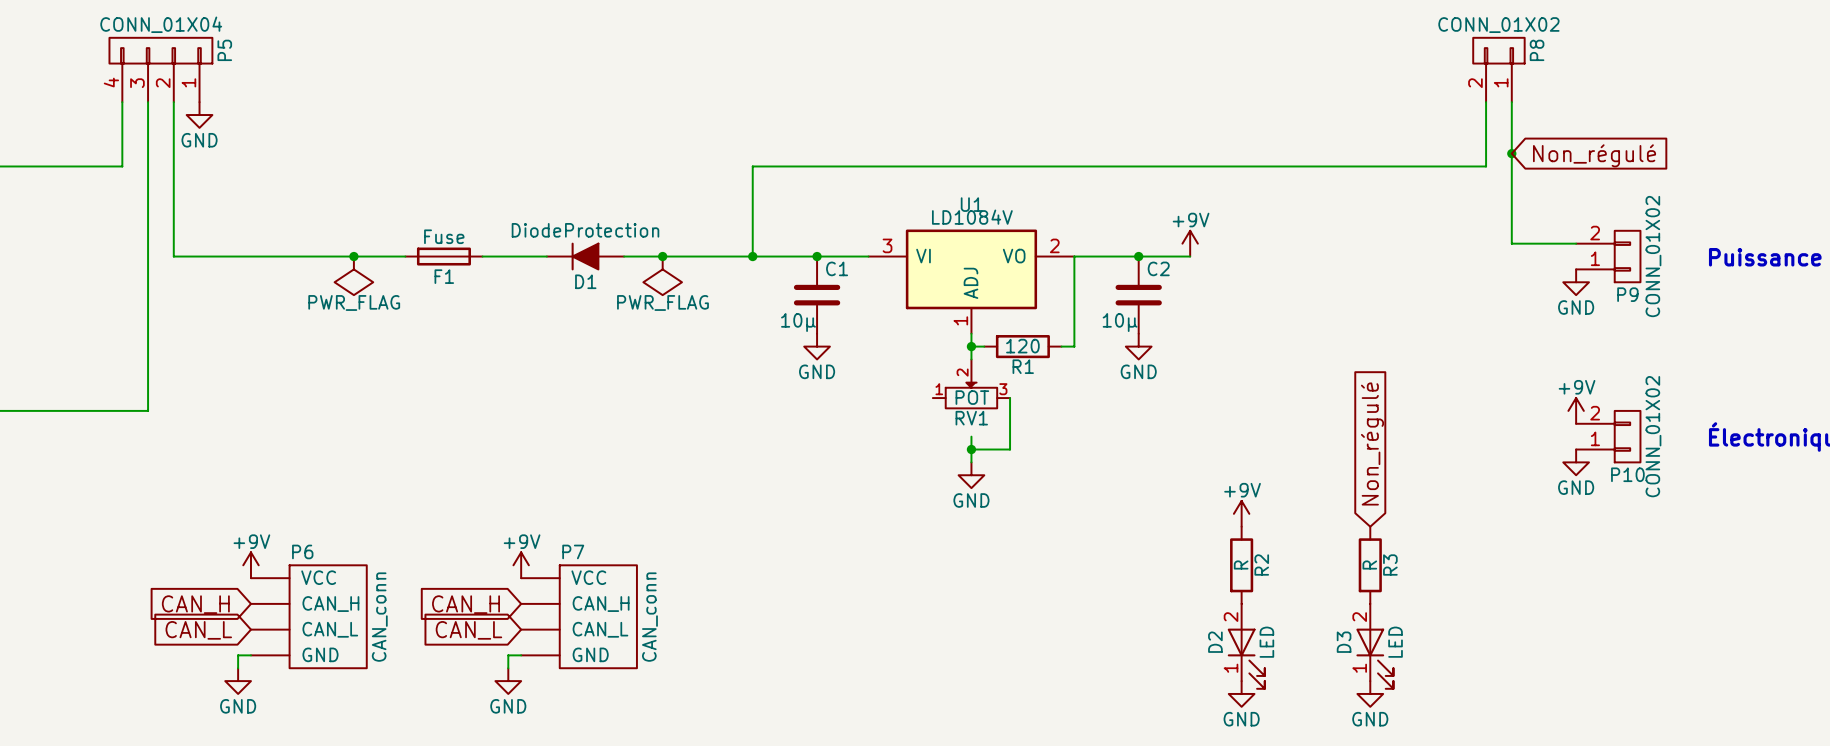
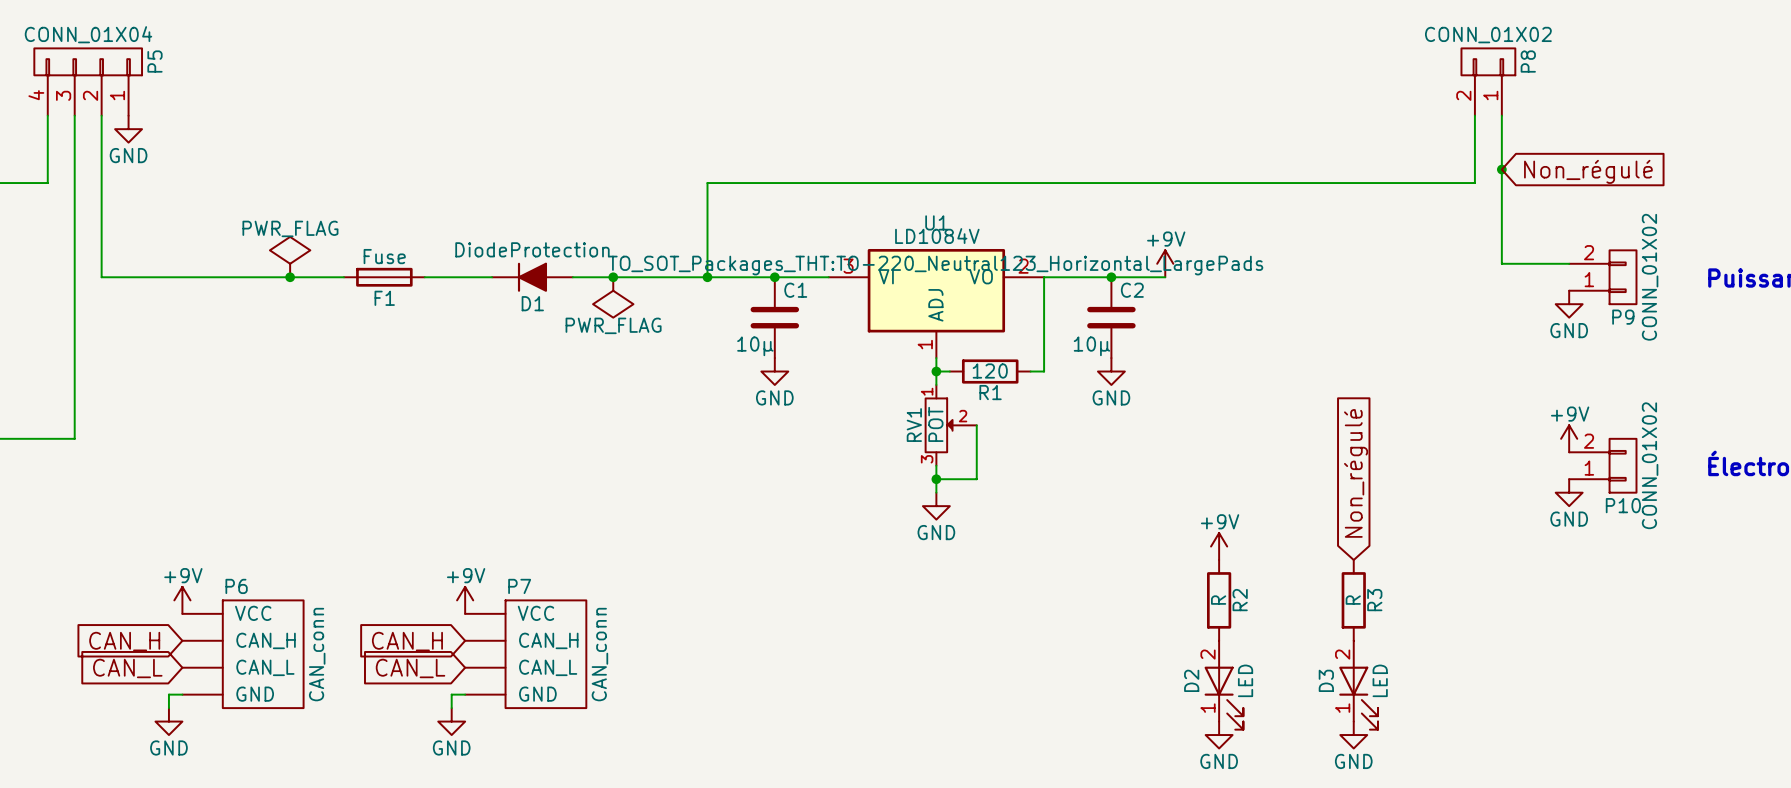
U1 text: none -> TO_SOT_Packages_THT:TO-220_Neutral123_Horizontal_LargePads (935, 265)
power symbol rotation: 0° (353, 275) -> 180° (290, 257)
power symbol position: PWR_FLAG (353, 275) -> PWR_FLAG (290, 257)
RV1 rotation: 0° (971, 395) -> 90° clockwise (939, 425)

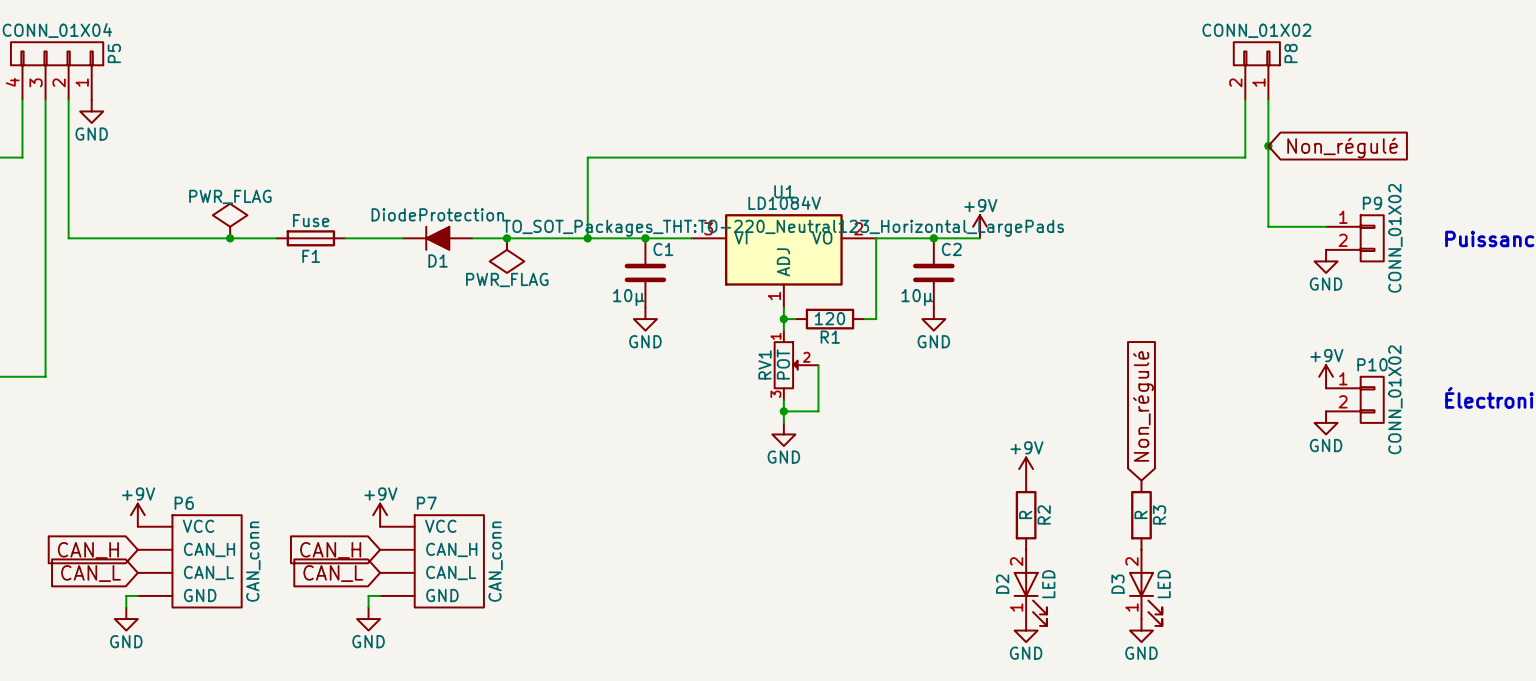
P9 flip: as is (1623, 277) -> up-down (1372, 238)
P10 flip: as is (1623, 465) -> up-down (1372, 399)

